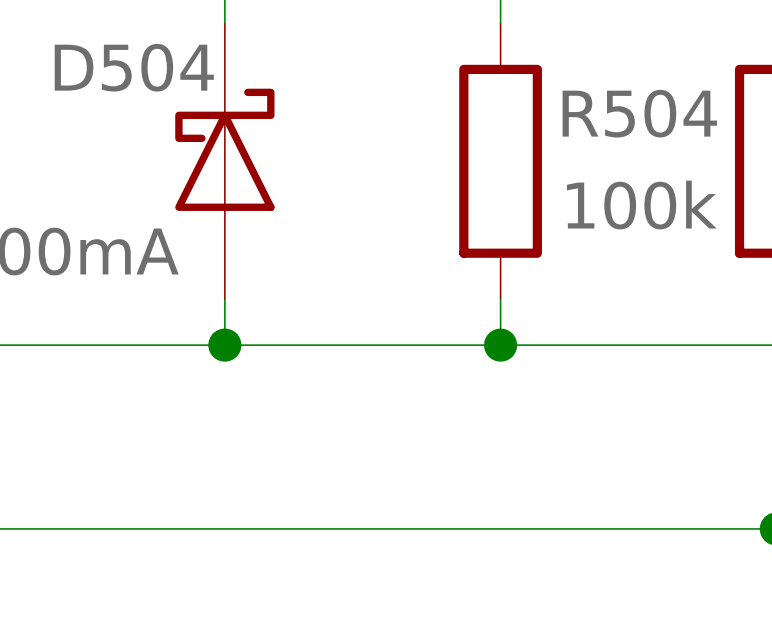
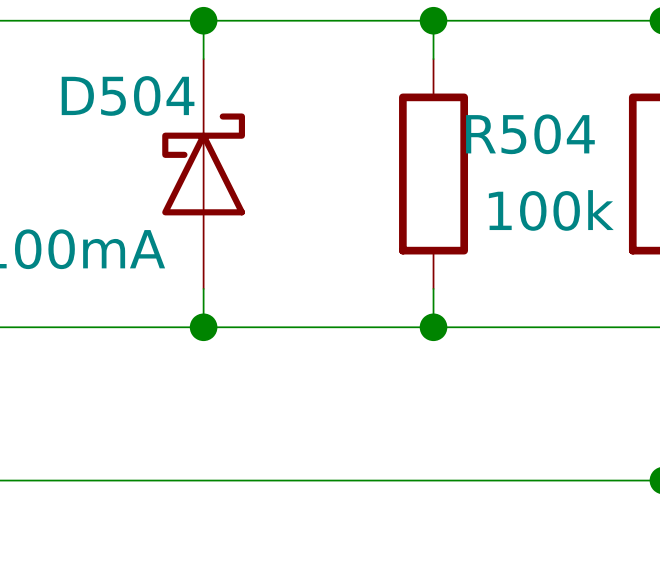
R504 name position: R504 (639, 113) -> R504 (530, 134)

